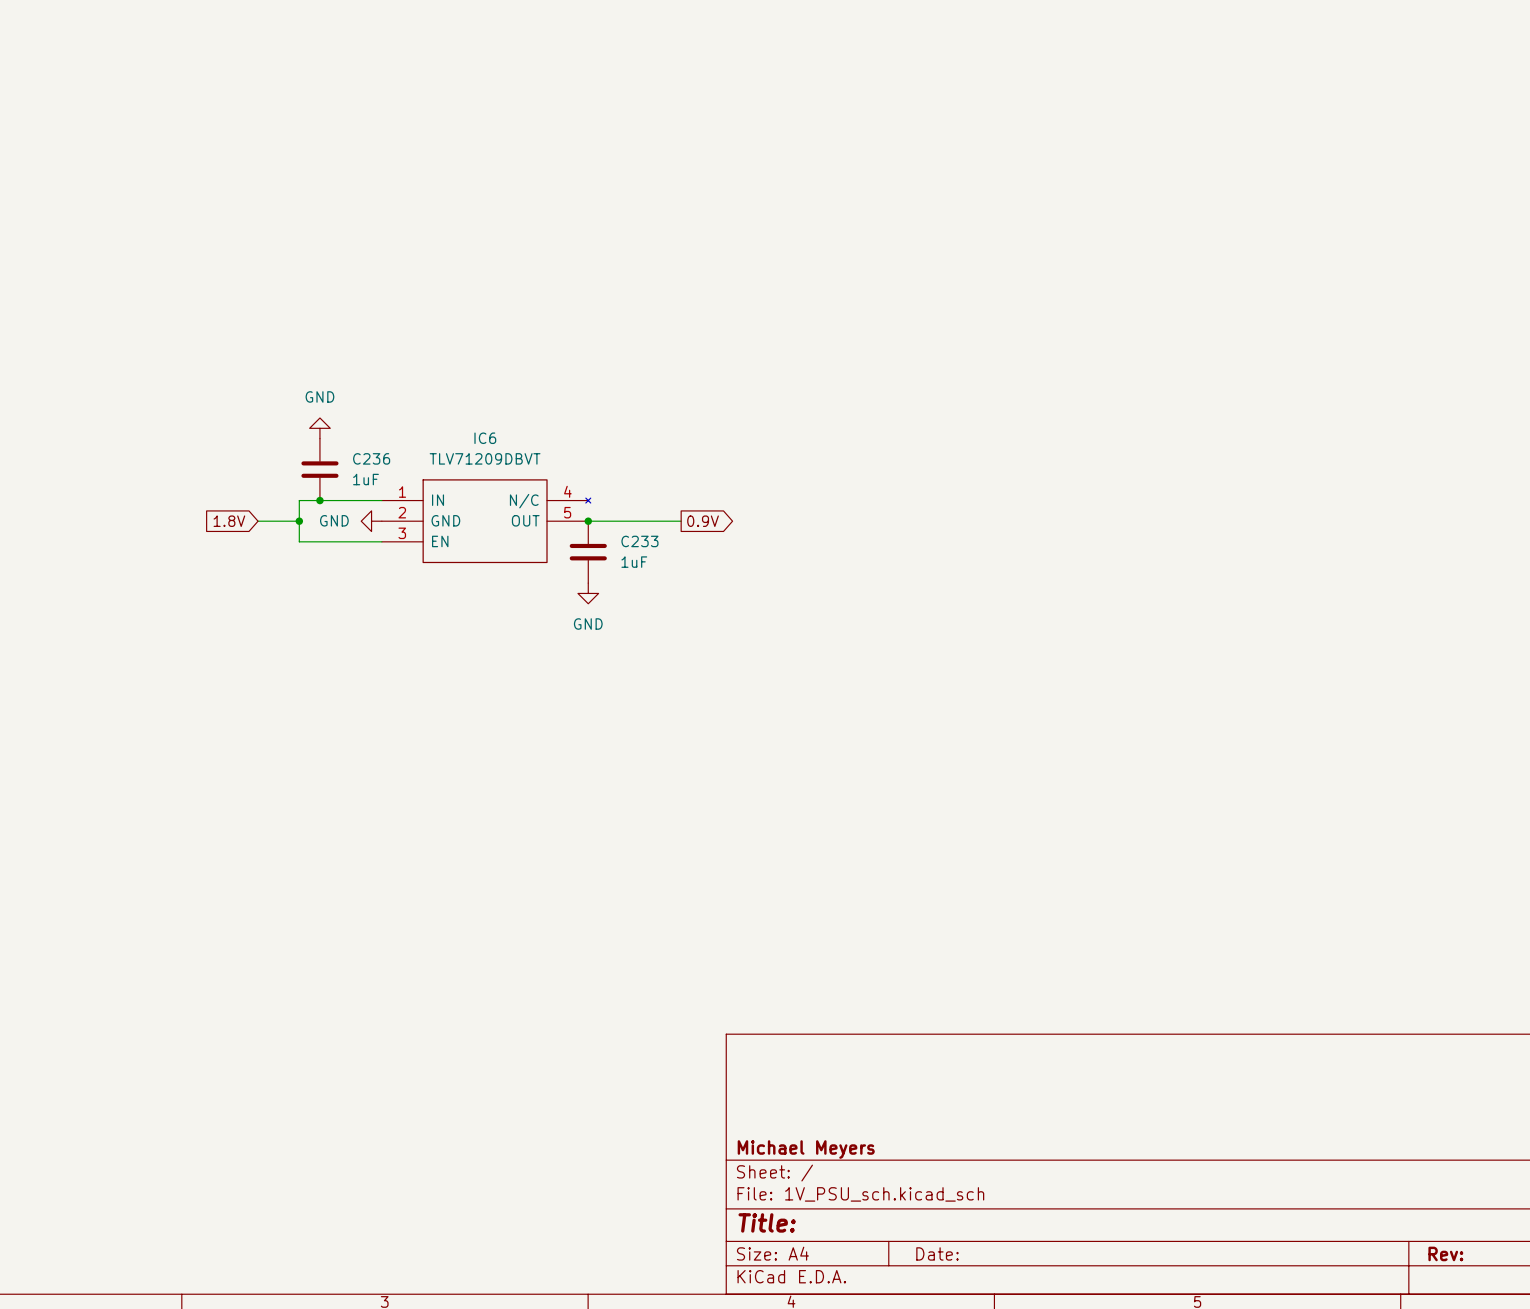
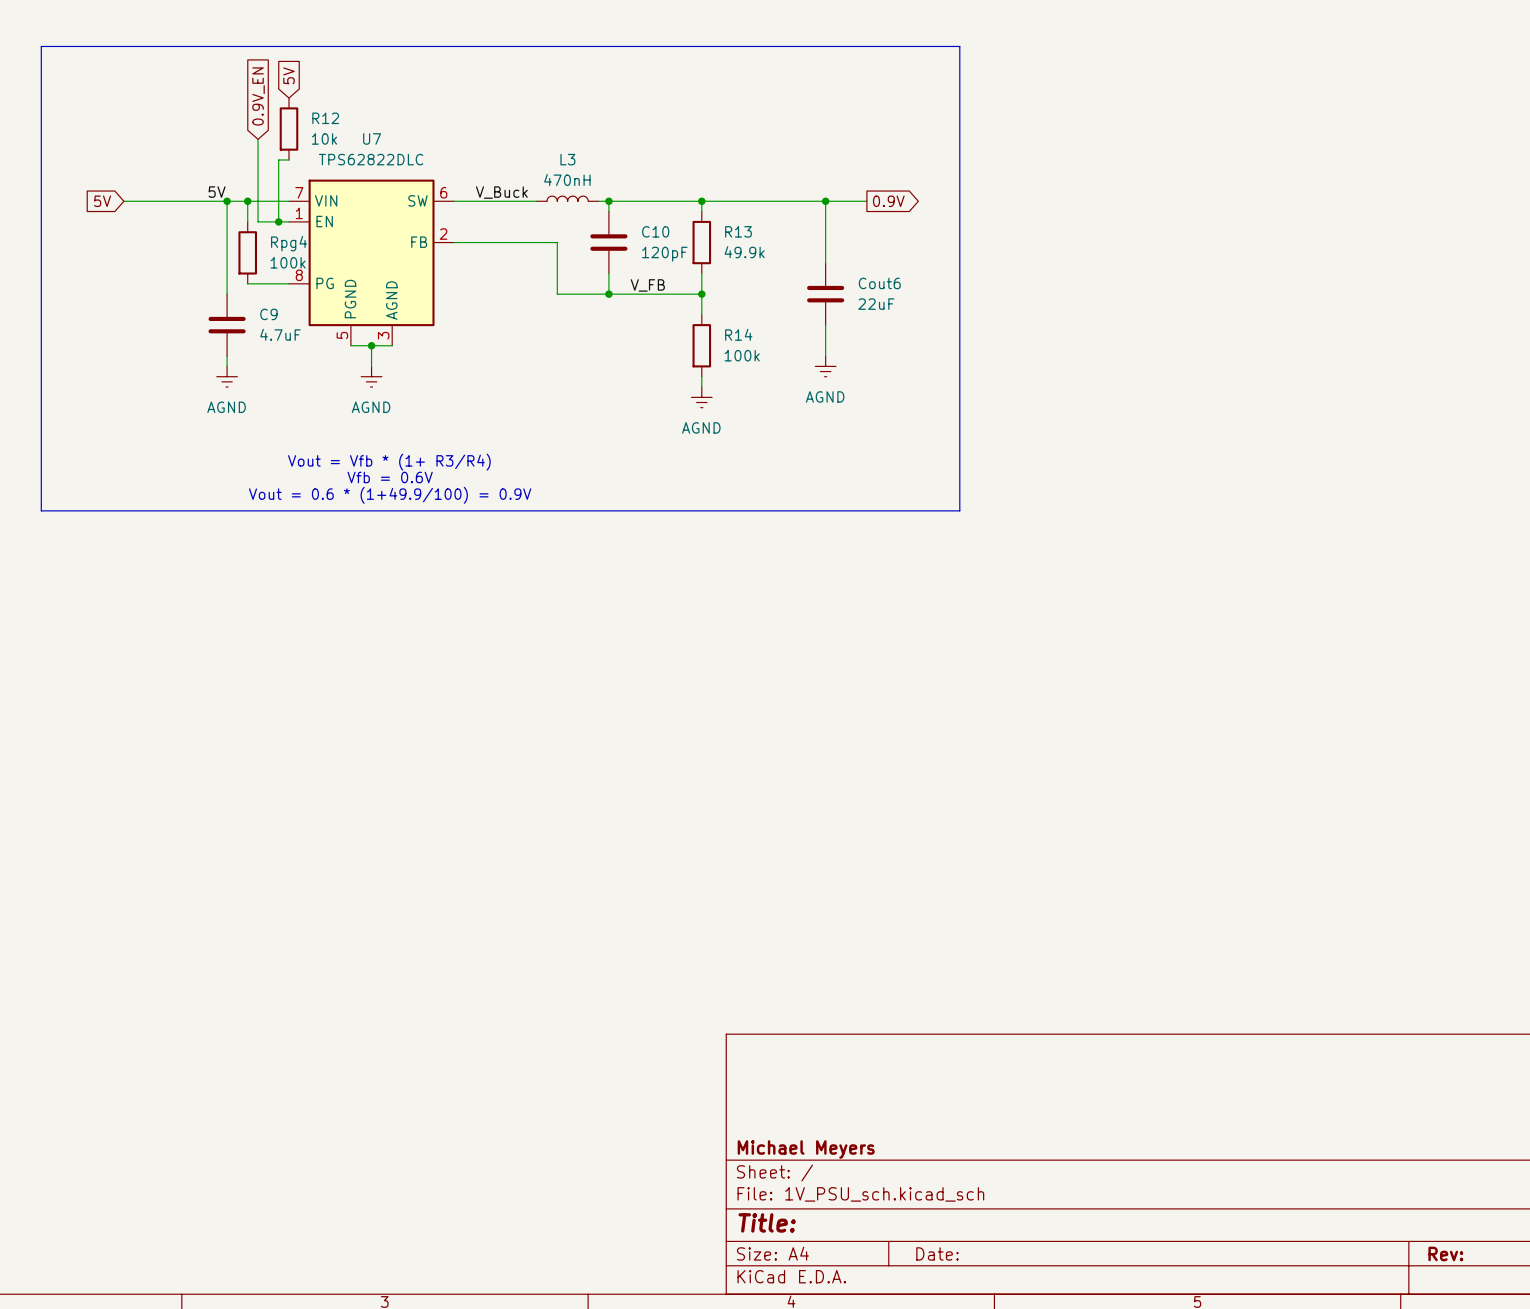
line: none -> (41, 46) (959, 46) (959, 510) (41, 510) (41, 46)
global label: none -> 5V (288, 75)
global label: none -> 0.9V_EN (258, 96)
R12: none -> 10k (288, 129)
wire: none -> (258, 139) (258, 221) (288, 221)
wire: none -> (288, 159) (278, 159) (278, 221)
label: none -> 5V (217, 192)
label: none -> V_Buck (501, 192)
L3: none -> 470nH (567, 198)
global label: none -> 5V (102, 201)
wire: none -> (123, 201) (288, 201)
wire: none -> (227, 201) (227, 294)
junction: none -> (227, 201)
wire: none -> (247, 201) (247, 221)
junction: none -> (247, 201)
wire: none -> (454, 201) (536, 201)
wire: none -> (598, 201) (866, 201)
wire: none -> (608, 201) (608, 211)
junction: none -> (608, 201)
wire: none -> (701, 201) (701, 211)
junction: none -> (701, 201)
wire: none -> (825, 201) (825, 263)
junction: none -> (825, 201)
global label: none -> 0.9V (888, 201)
junction: none -> (278, 221)
wire: none -> (454, 242) (557, 242) (557, 294) (701, 294)
C10: none -> 120pF (608, 242)
R13: none -> 49.9k (701, 242)
Rpg4: none -> 100k (247, 252)
U7: none -> TPS62822DLC (371, 262)
wire: none -> (608, 273) (608, 294)
wire: none -> (701, 273) (701, 314)
wire: none -> (247, 283) (288, 283)
label: none -> V_FB (647, 285)
junction: none -> (608, 294)
junction: none -> (701, 294)
Cout6: none -> 22uF (825, 294)
C9: none -> 4.7uF (227, 325)
wire: none -> (825, 325) (825, 356)
wire: none -> (371, 345) (371, 366)
junction: none -> (371, 345)
R14: none -> 100k (701, 345)
wire: none -> (227, 356) (227, 366)
power symbol: none -> AGND (825, 366)
power symbol: none -> AGND (227, 376)
power symbol: none -> AGND (371, 376)
wire: none -> (701, 376) (701, 387)
power symbol: none -> AGND (701, 397)
power symbol: GND (319, 428) -> none
text: none -> Vout = Vfb * (1+ R3/R4) (389, 462)
C236: 1uF (319, 469) -> none
text: none -> Vfb = 0.6V (390, 477)
text: none -> Vout = 0.6 * (1+49.9/100) = 0.9V (390, 495)
junction: (319, 500) -> none
wire: (381, 500) (299, 500) (299, 541) (381, 541) -> none
global label: 1.8V (229, 521) -> none
wire: (258, 521) (299, 521) -> (350, 345) (392, 345)
junction: (299, 521) -> none
power symbol: GND (371, 521) -> none
IC6: TLV71209DBVT (486, 521) -> none
wire: (588, 521) (681, 521) -> none
junction: (588, 521) -> none
global label: 0.9V (703, 521) -> none
C233: 1uF (588, 552) -> none
power symbol: GND (588, 593) -> none

